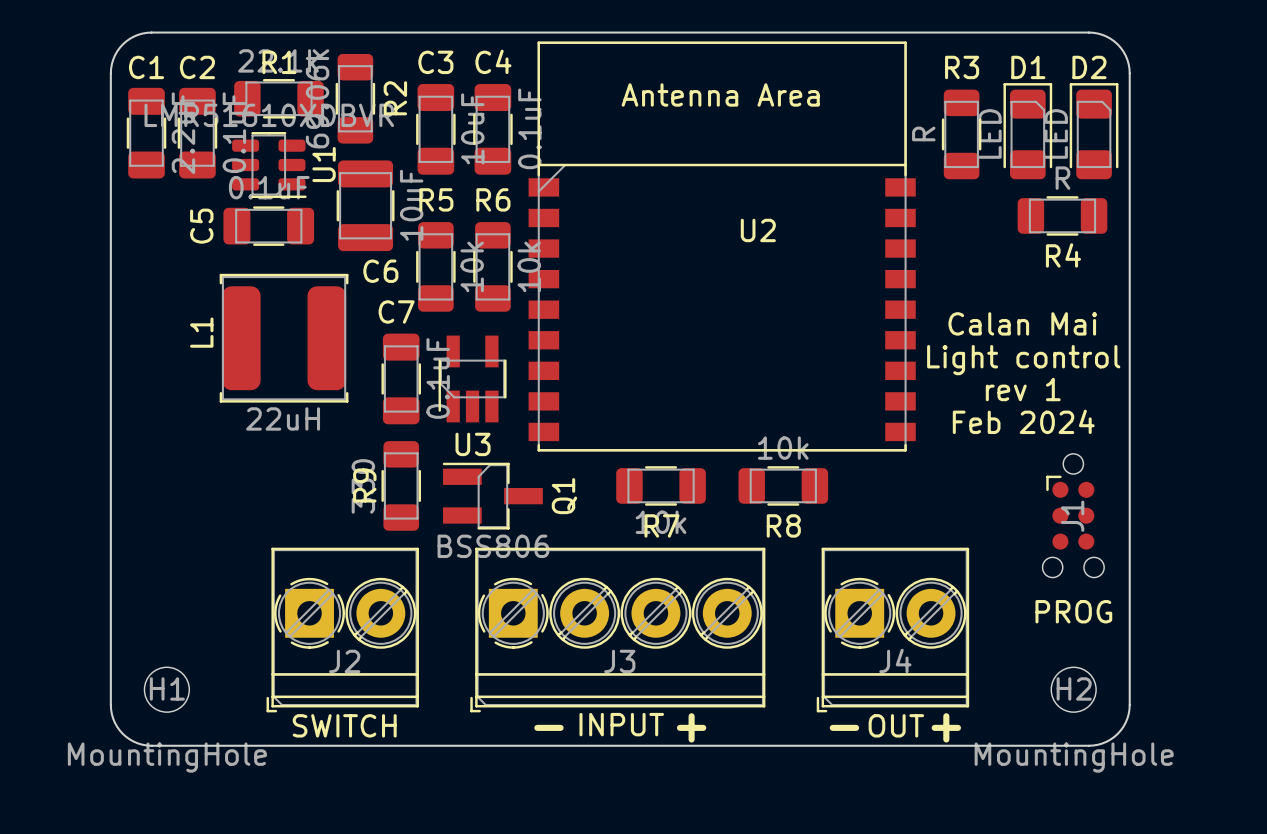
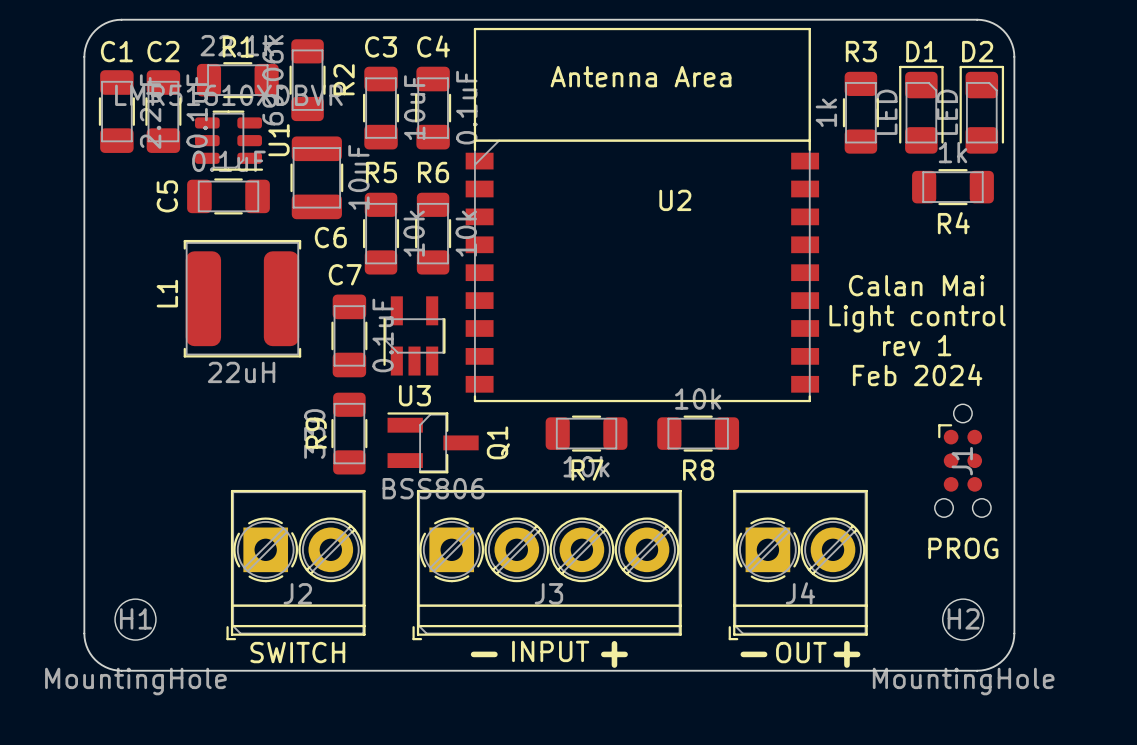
R3 value: R (923, 133) -> 1k (826, 112)
R4 value: R (1062, 178) -> 1k (952, 152)

